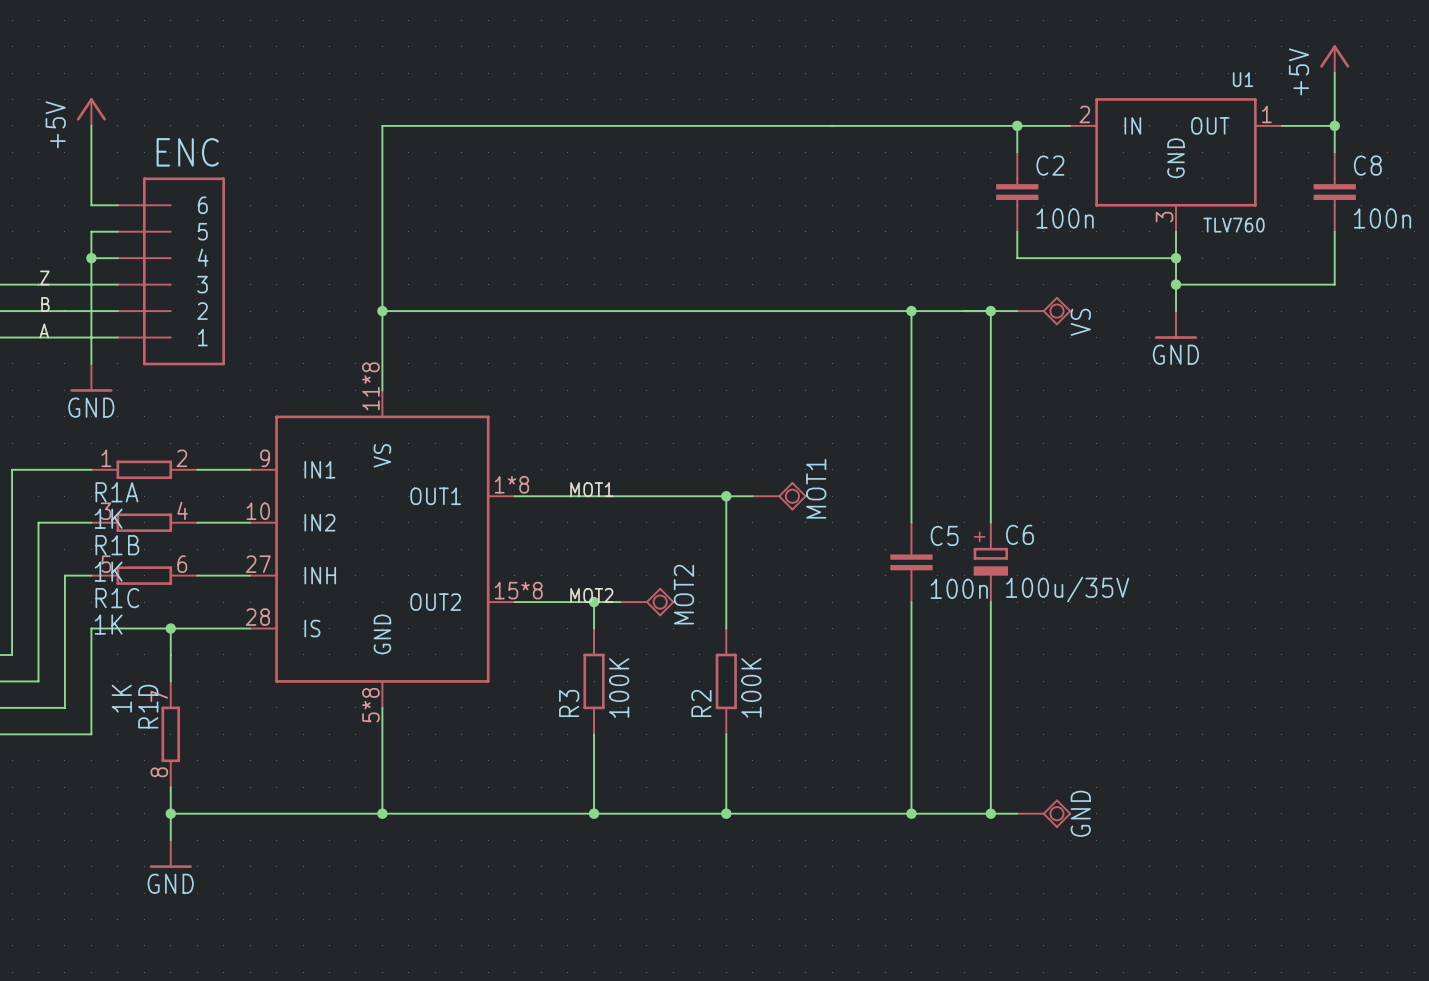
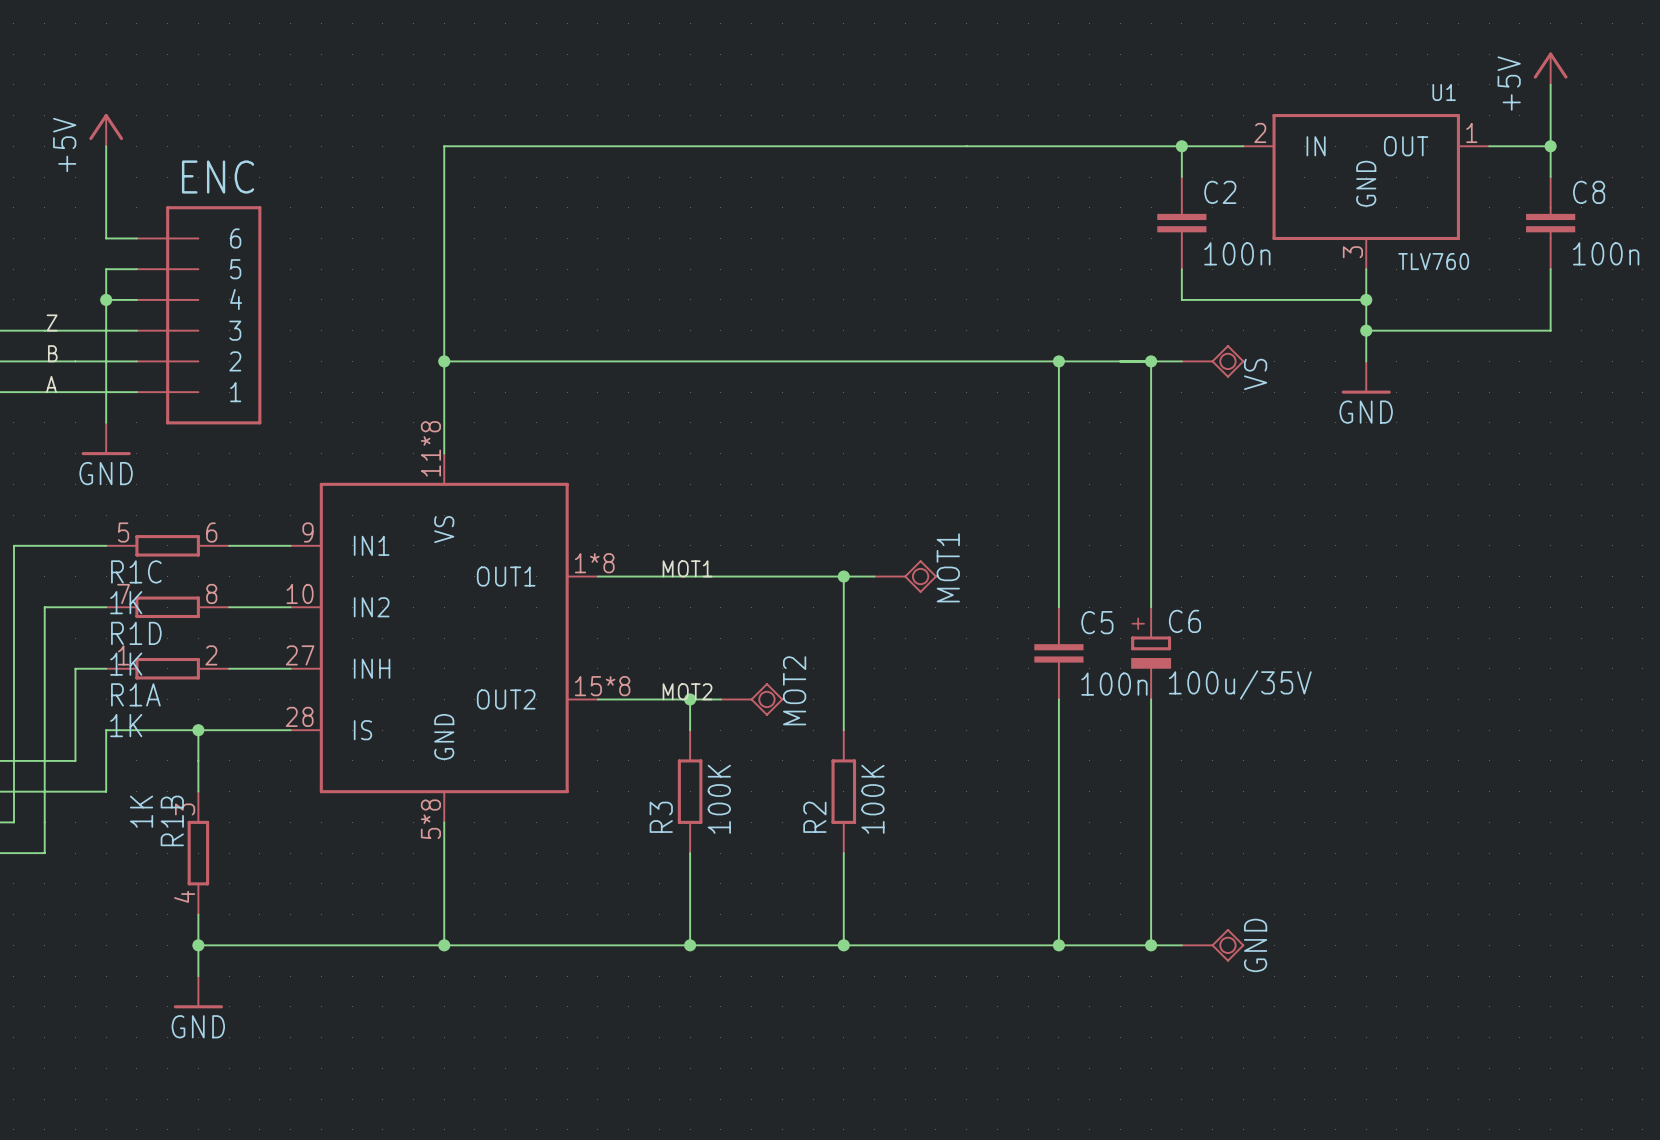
R1A position: (144, 469) -> (167, 668)
R1B rotation: 0° (144, 522) -> 90° clockwise (198, 853)
R1B position: (144, 522) -> (198, 853)
R1C position: (144, 575) -> (167, 545)
wire: (64, 654) (64, 707) (12, 707) -> (75, 760) (13, 760) (13, 822)
wire: (91, 681) (91, 734) (38, 734) -> (106, 791) (44, 791) (44, 853)
R1D rotation: 0° (170, 734) -> 90° counterclockwise (167, 607)
R1D position: (170, 734) -> (167, 607)

